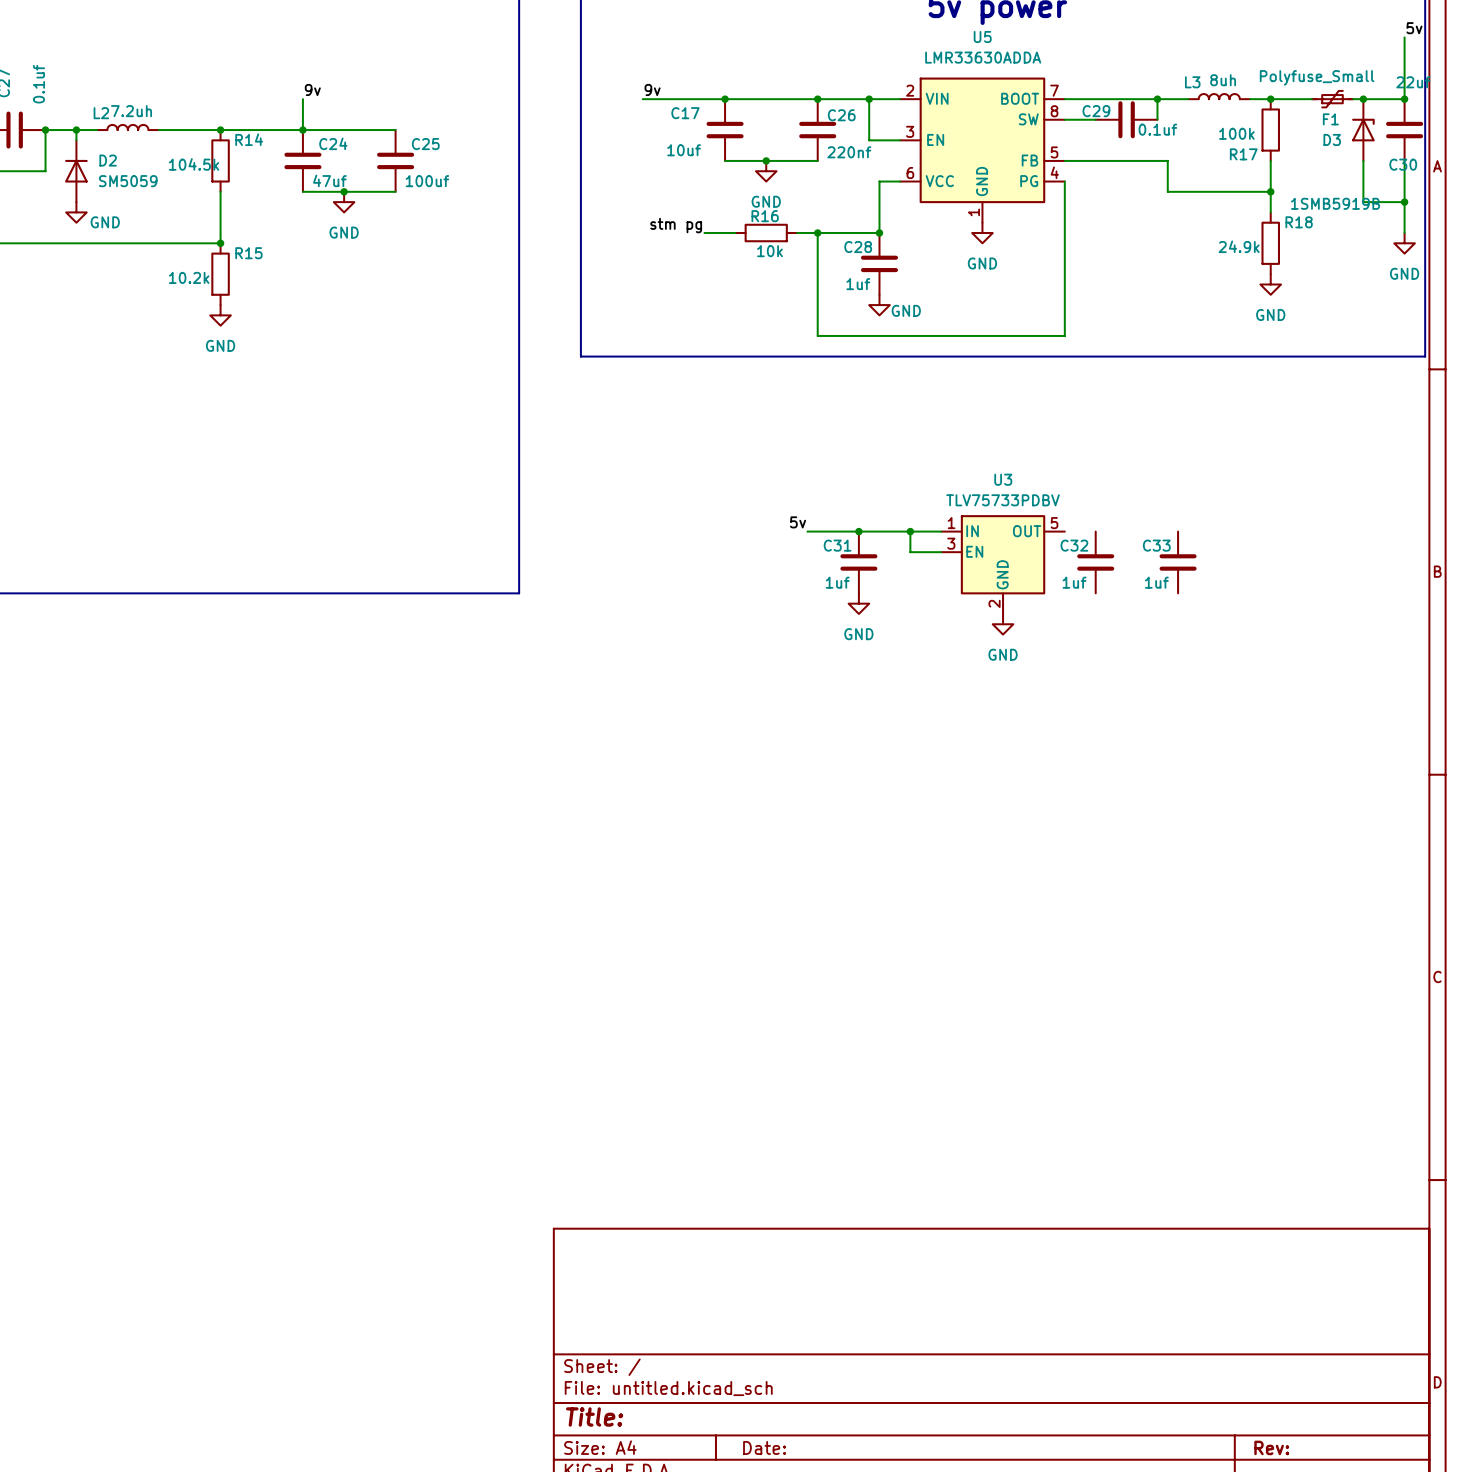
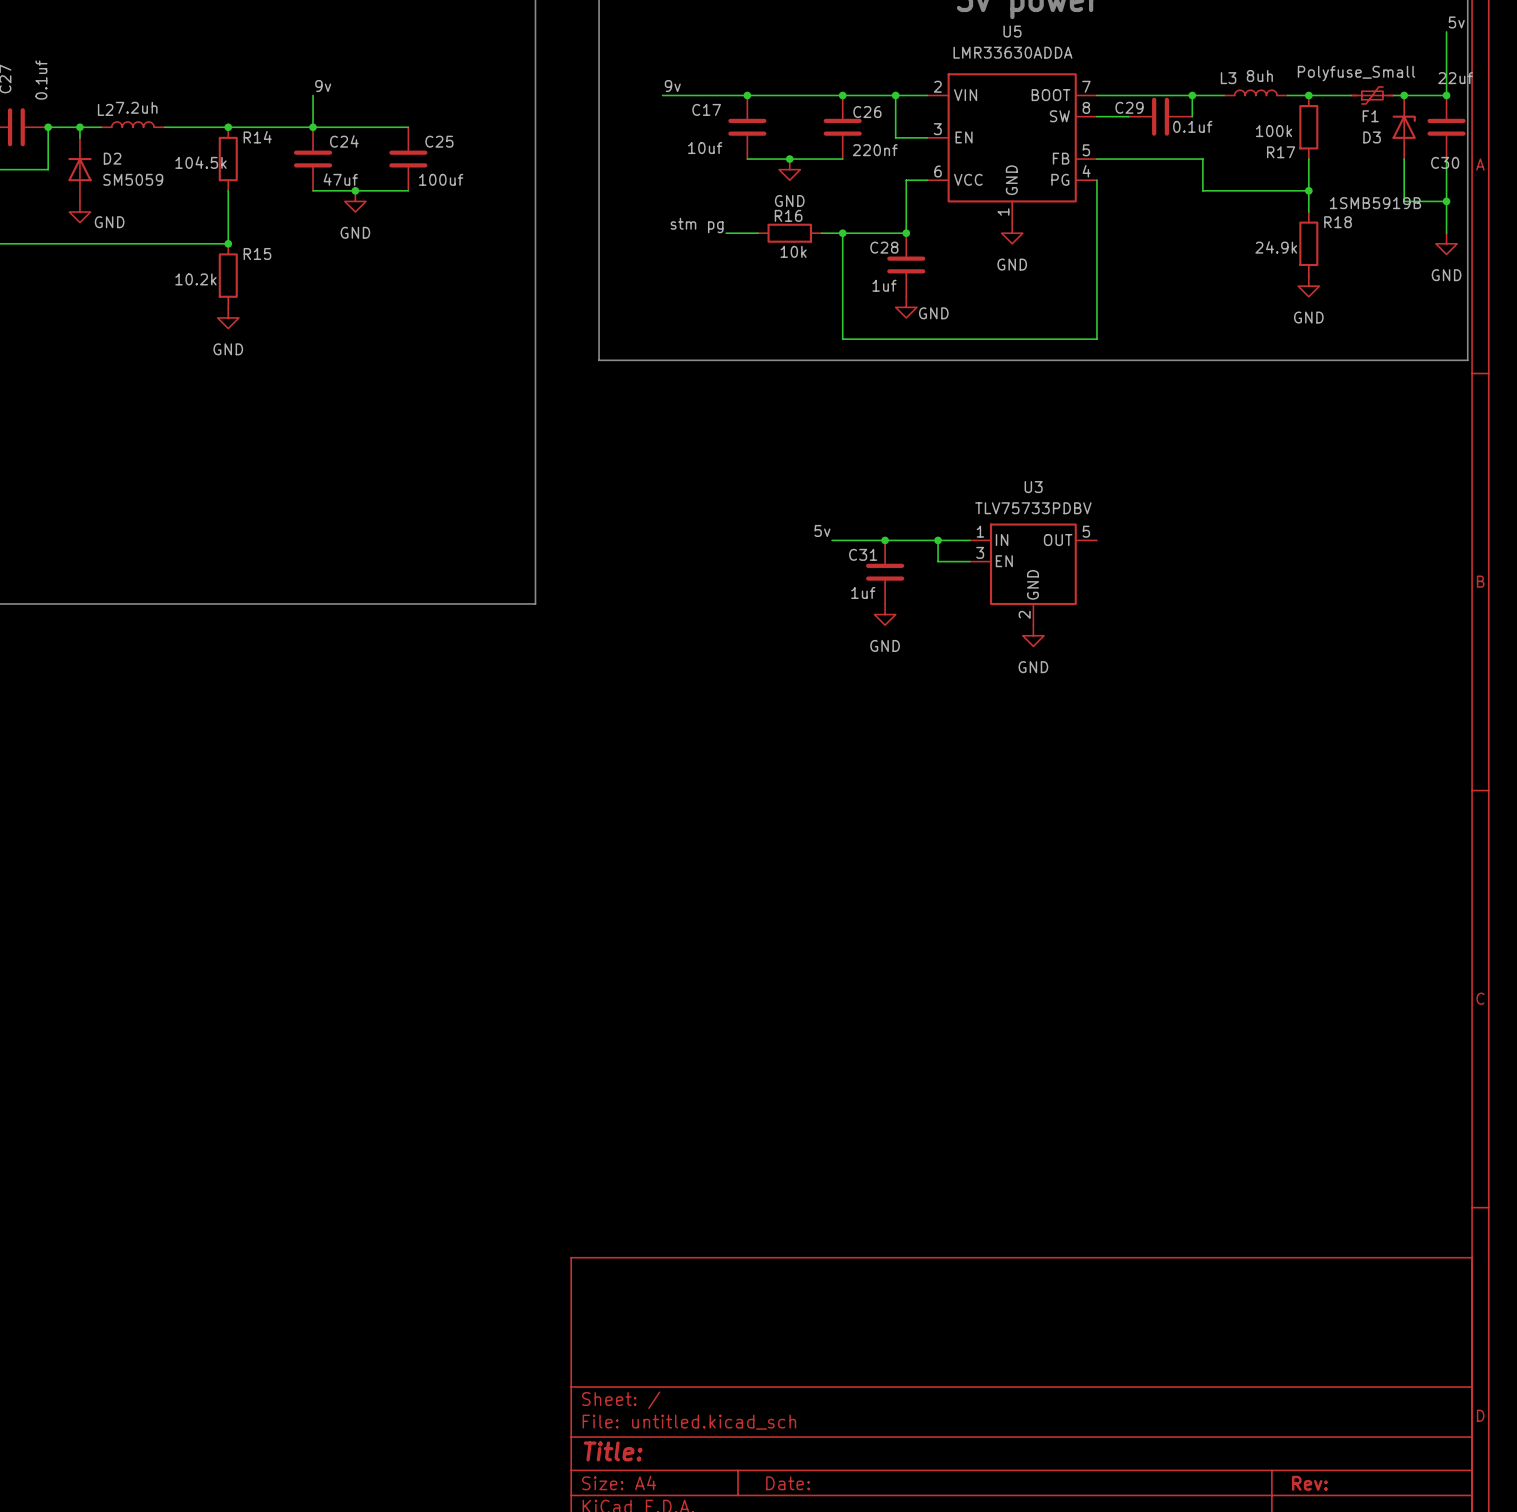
C32: 1uf (1095, 562) -> none
C33: 1uf (1178, 562) -> none

